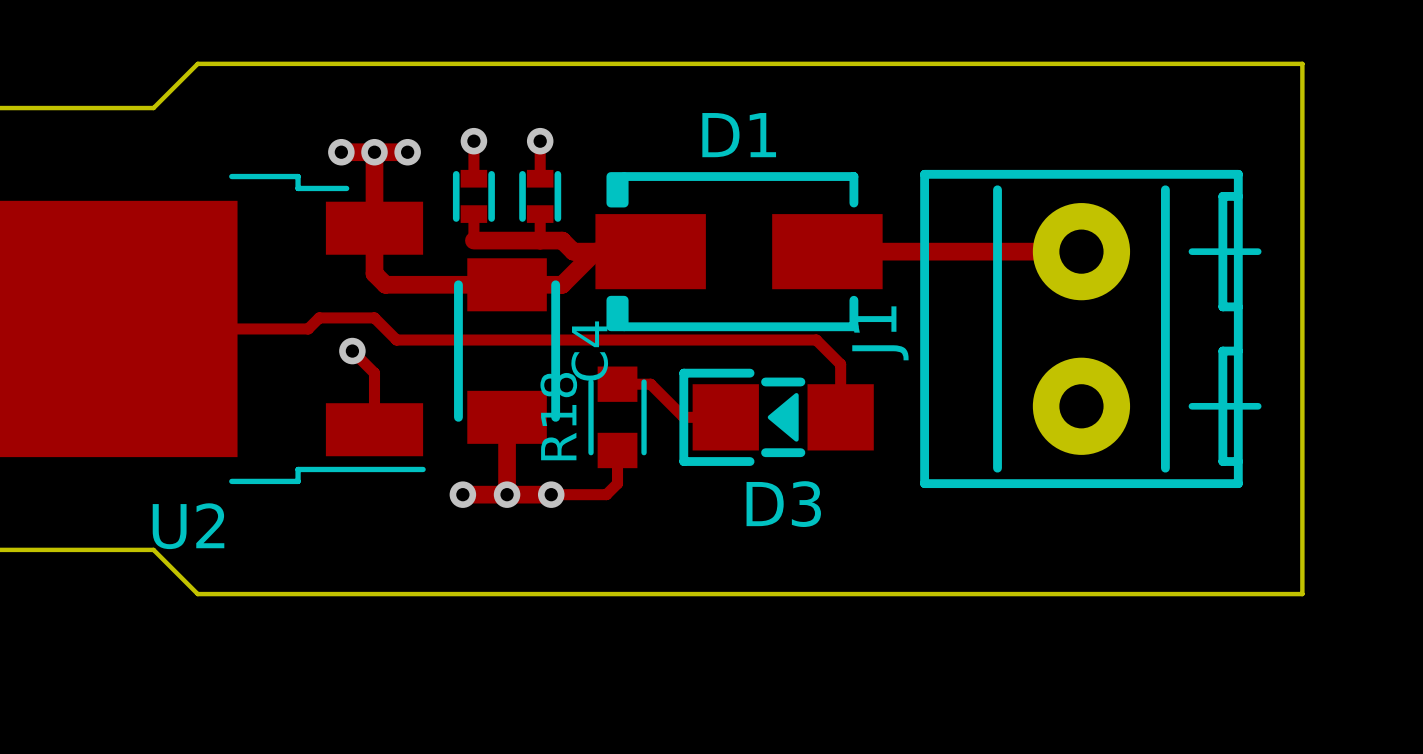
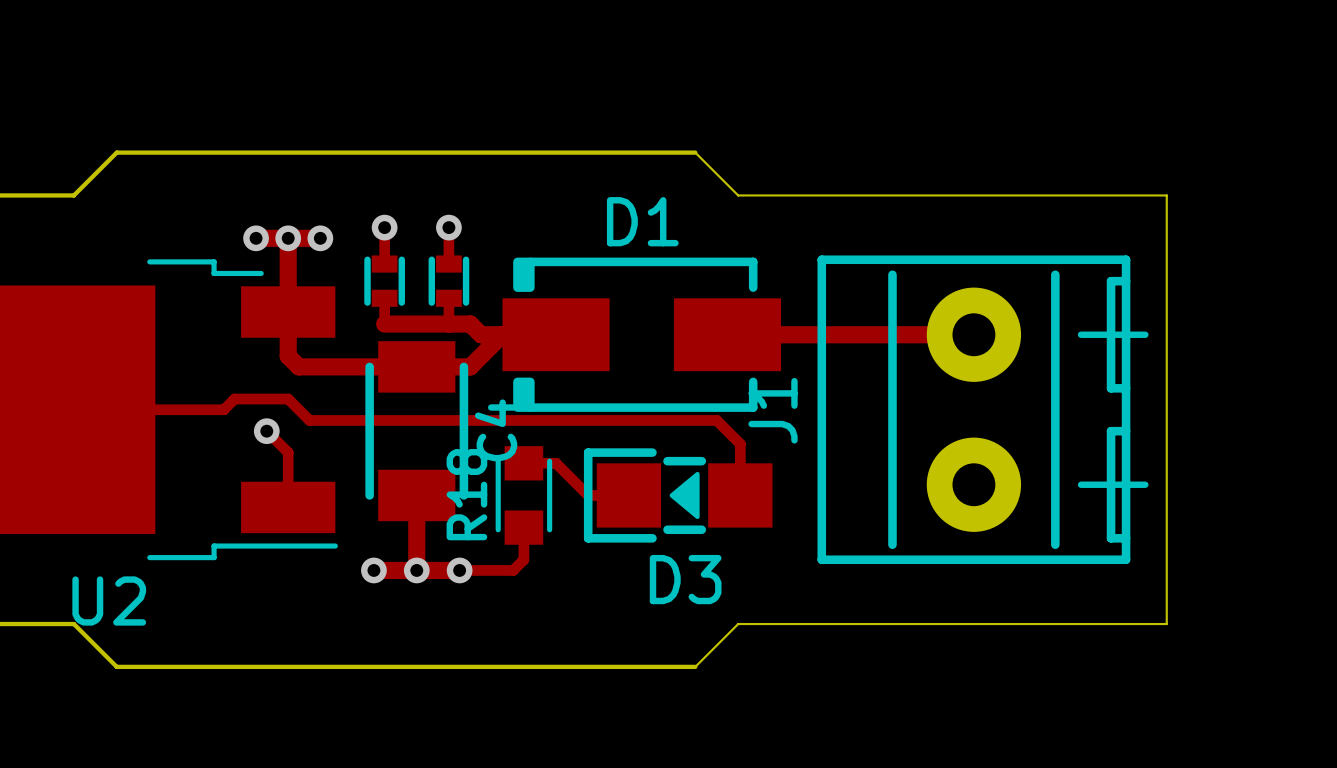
board edge: (794, 63) (1302, 63) (1302, 594) (794, 594) -> (695, 152) (738, 195) (1166, 195) (1166, 624) (738, 624) (695, 666)

